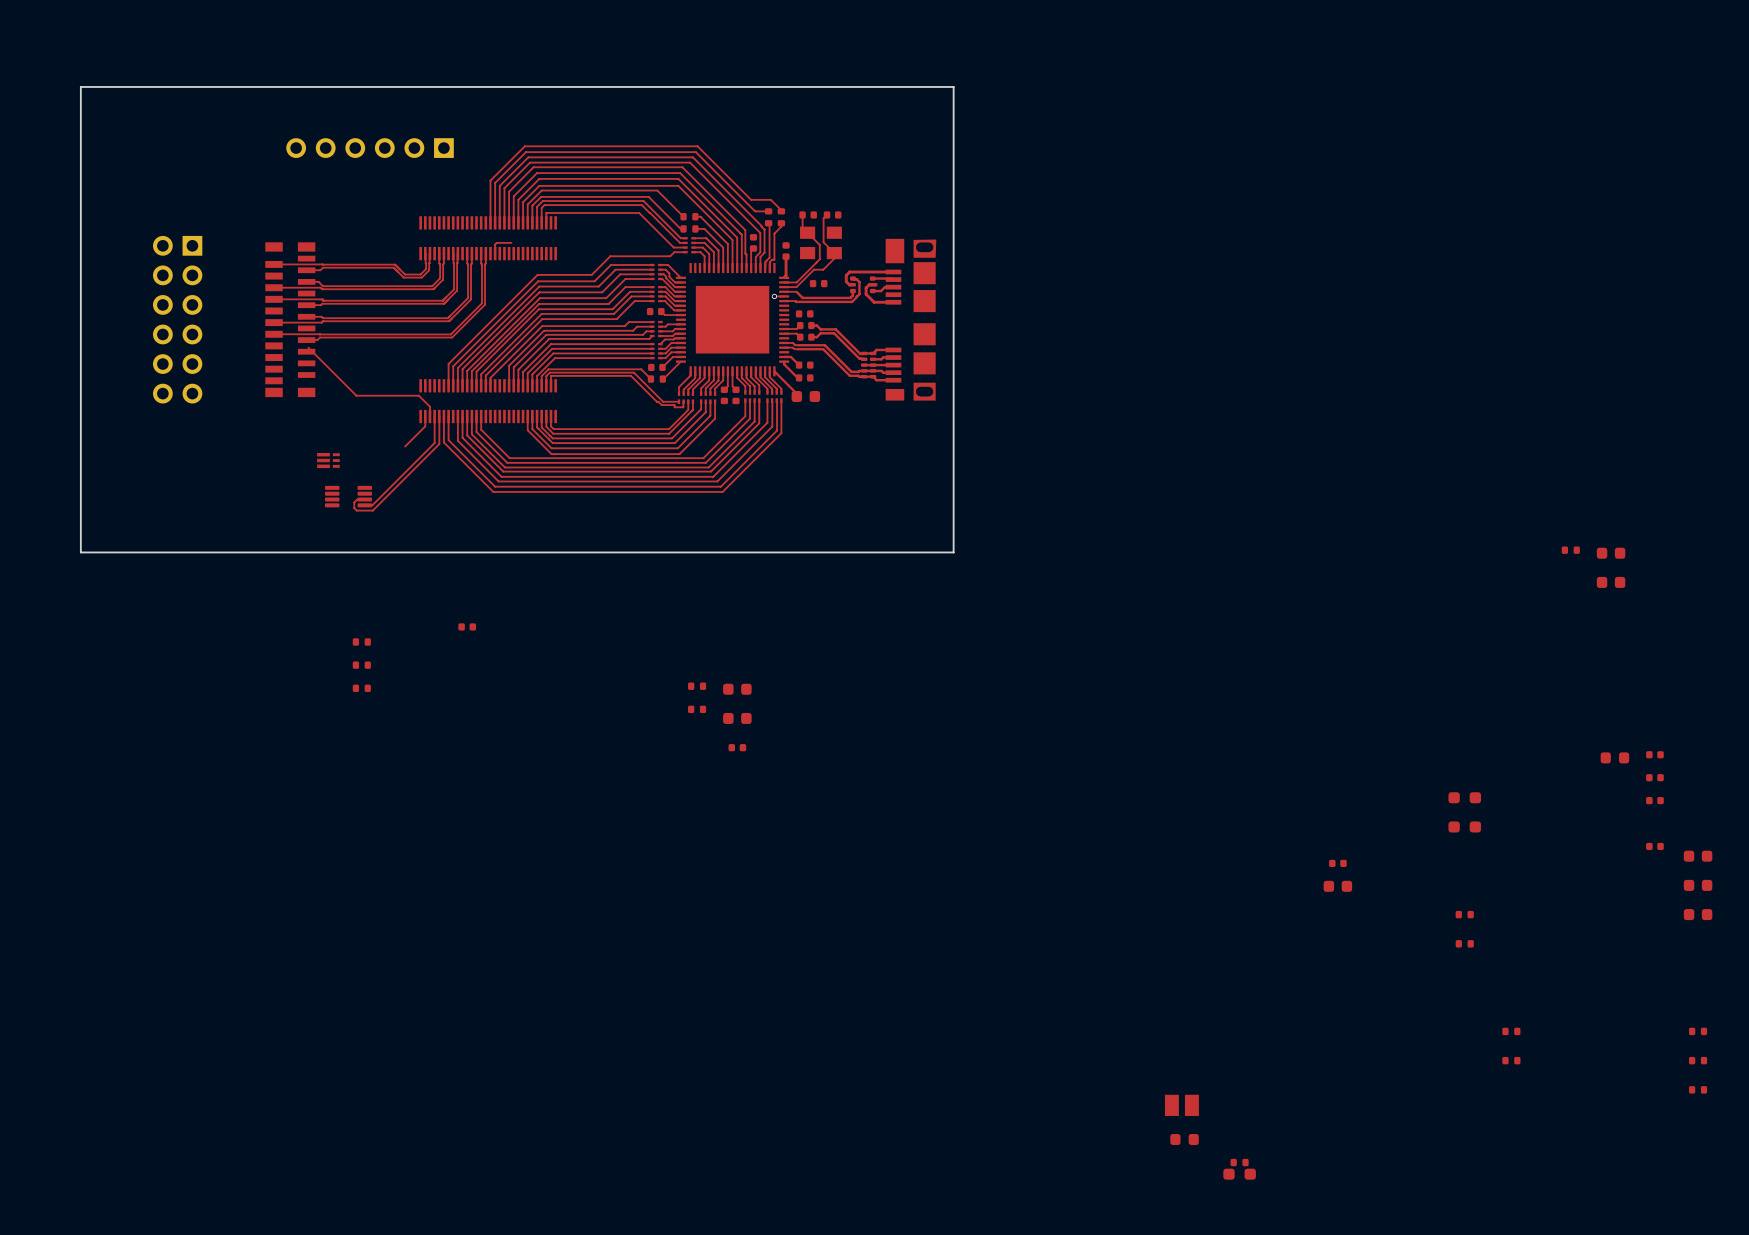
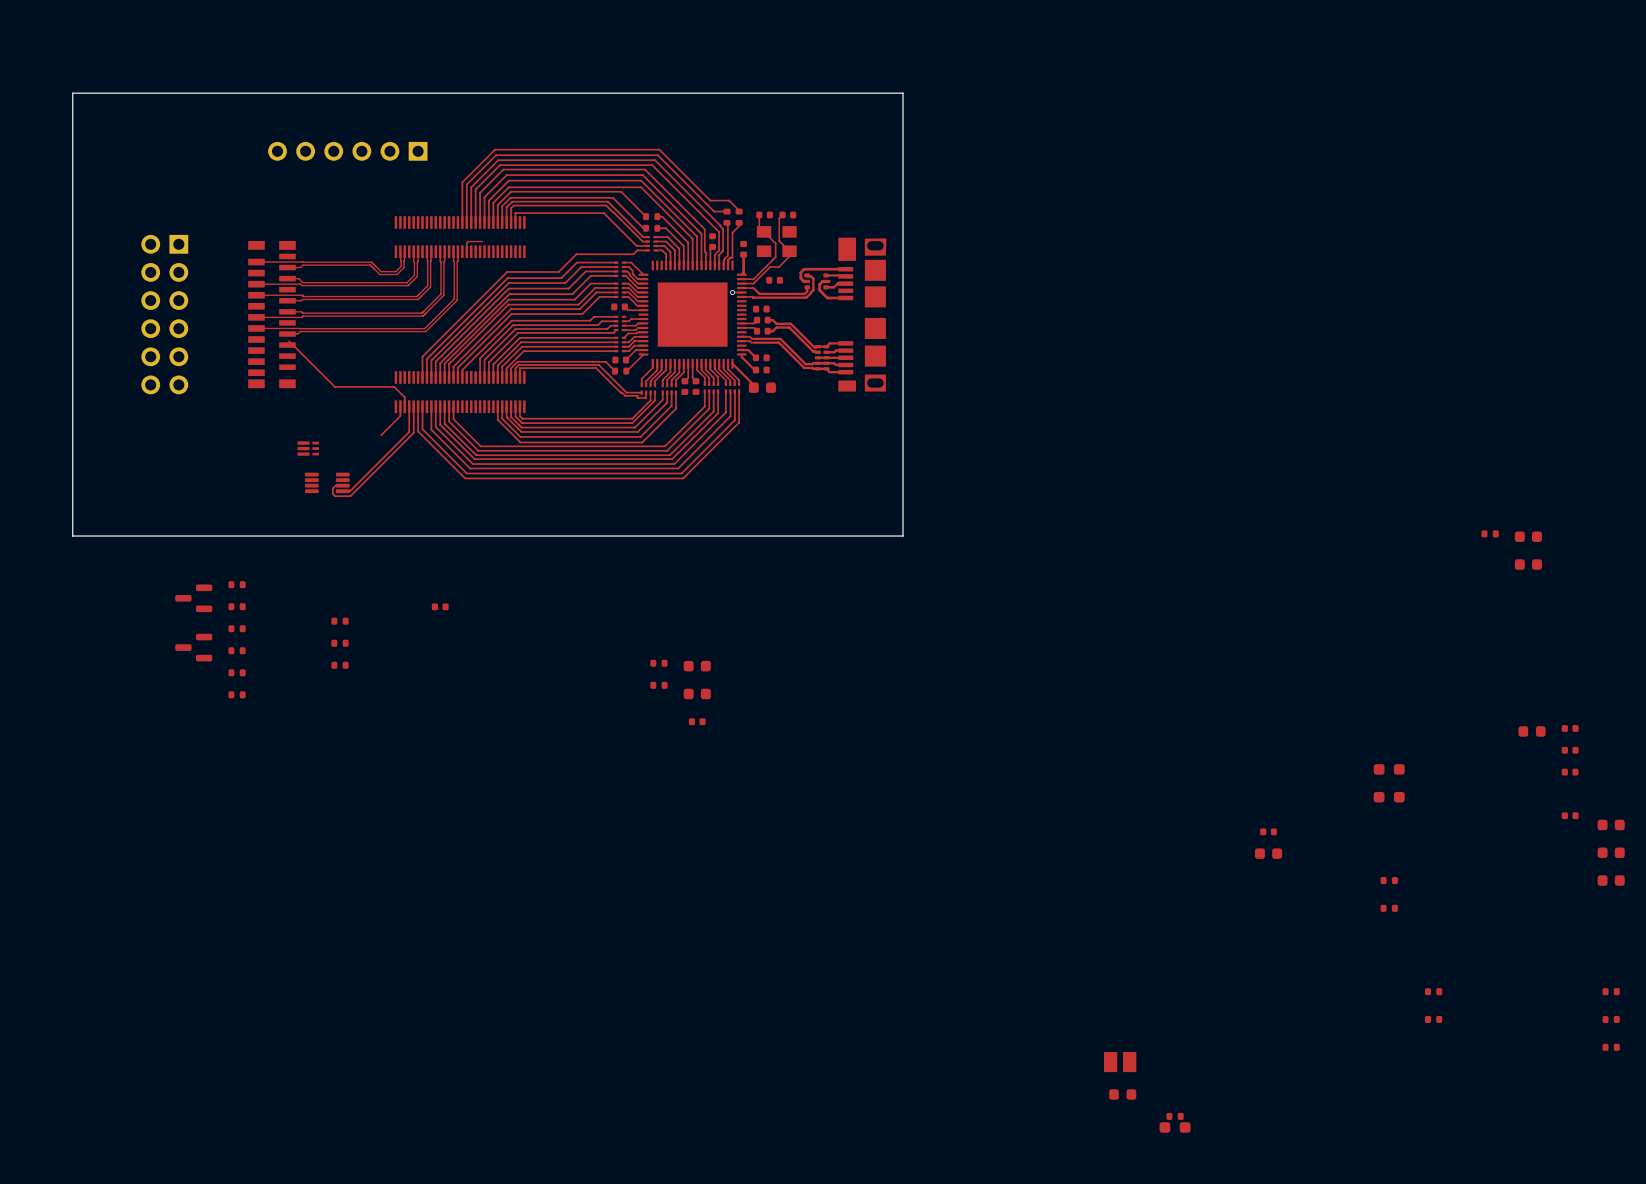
part: none -> (237, 584)
part: none -> (193, 598)
part: none -> (237, 606)
part: none -> (237, 628)
part: none -> (193, 647)
part: none -> (237, 650)
part: none -> (237, 672)
part: none -> (237, 694)

